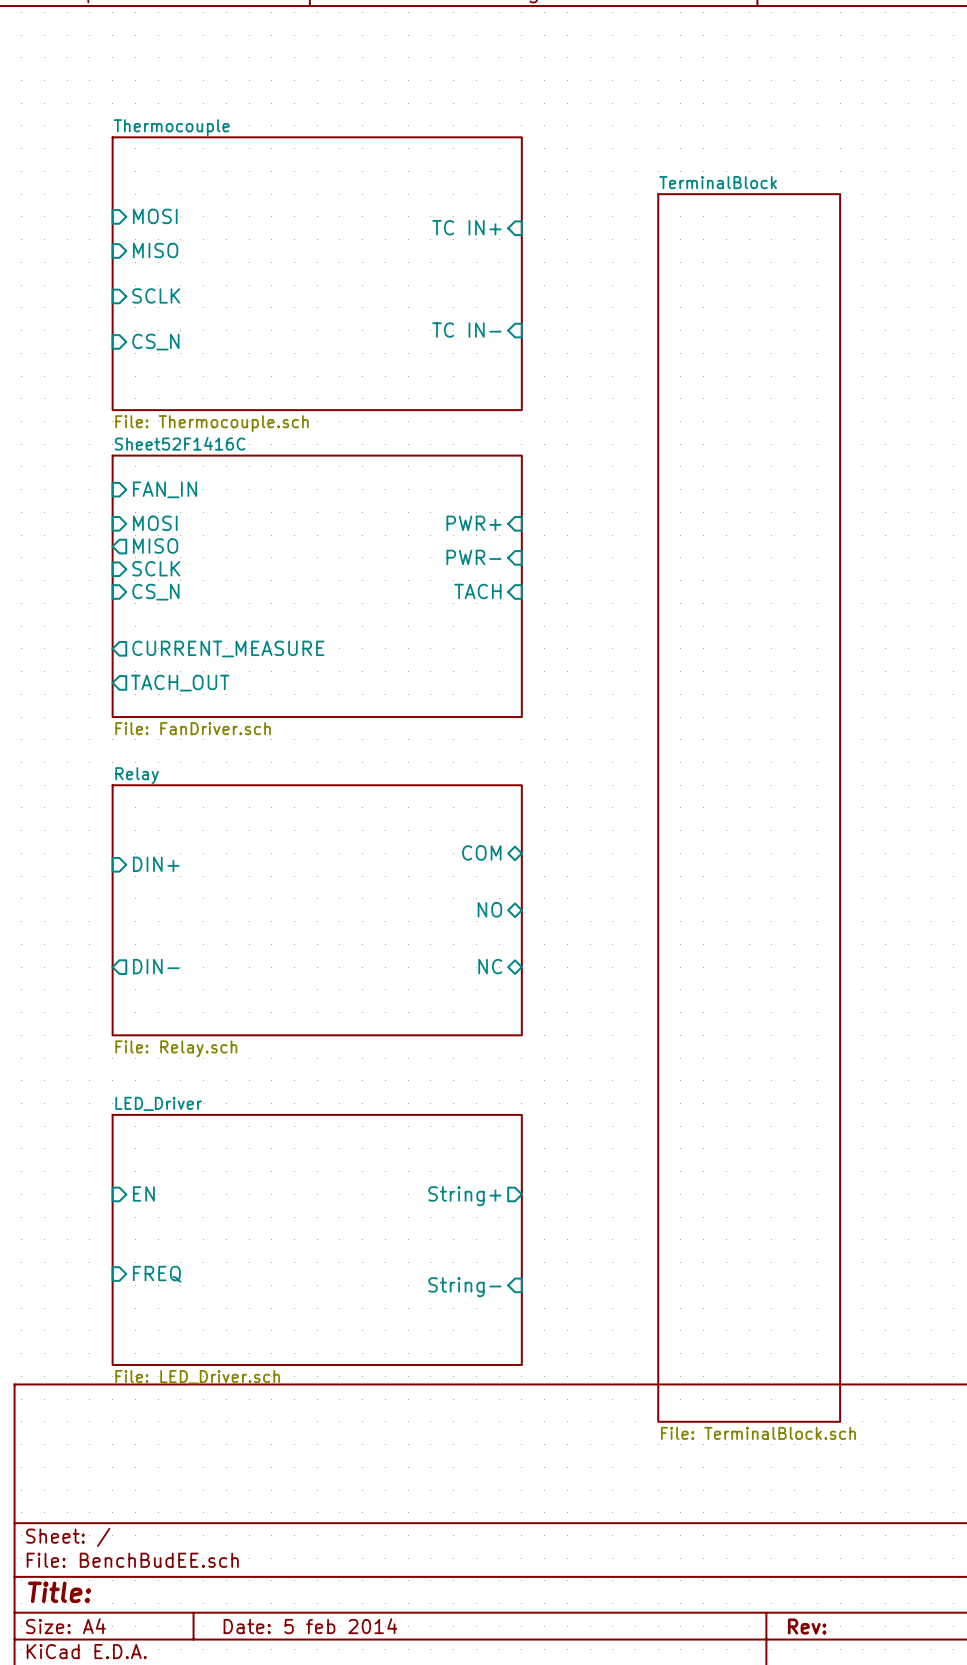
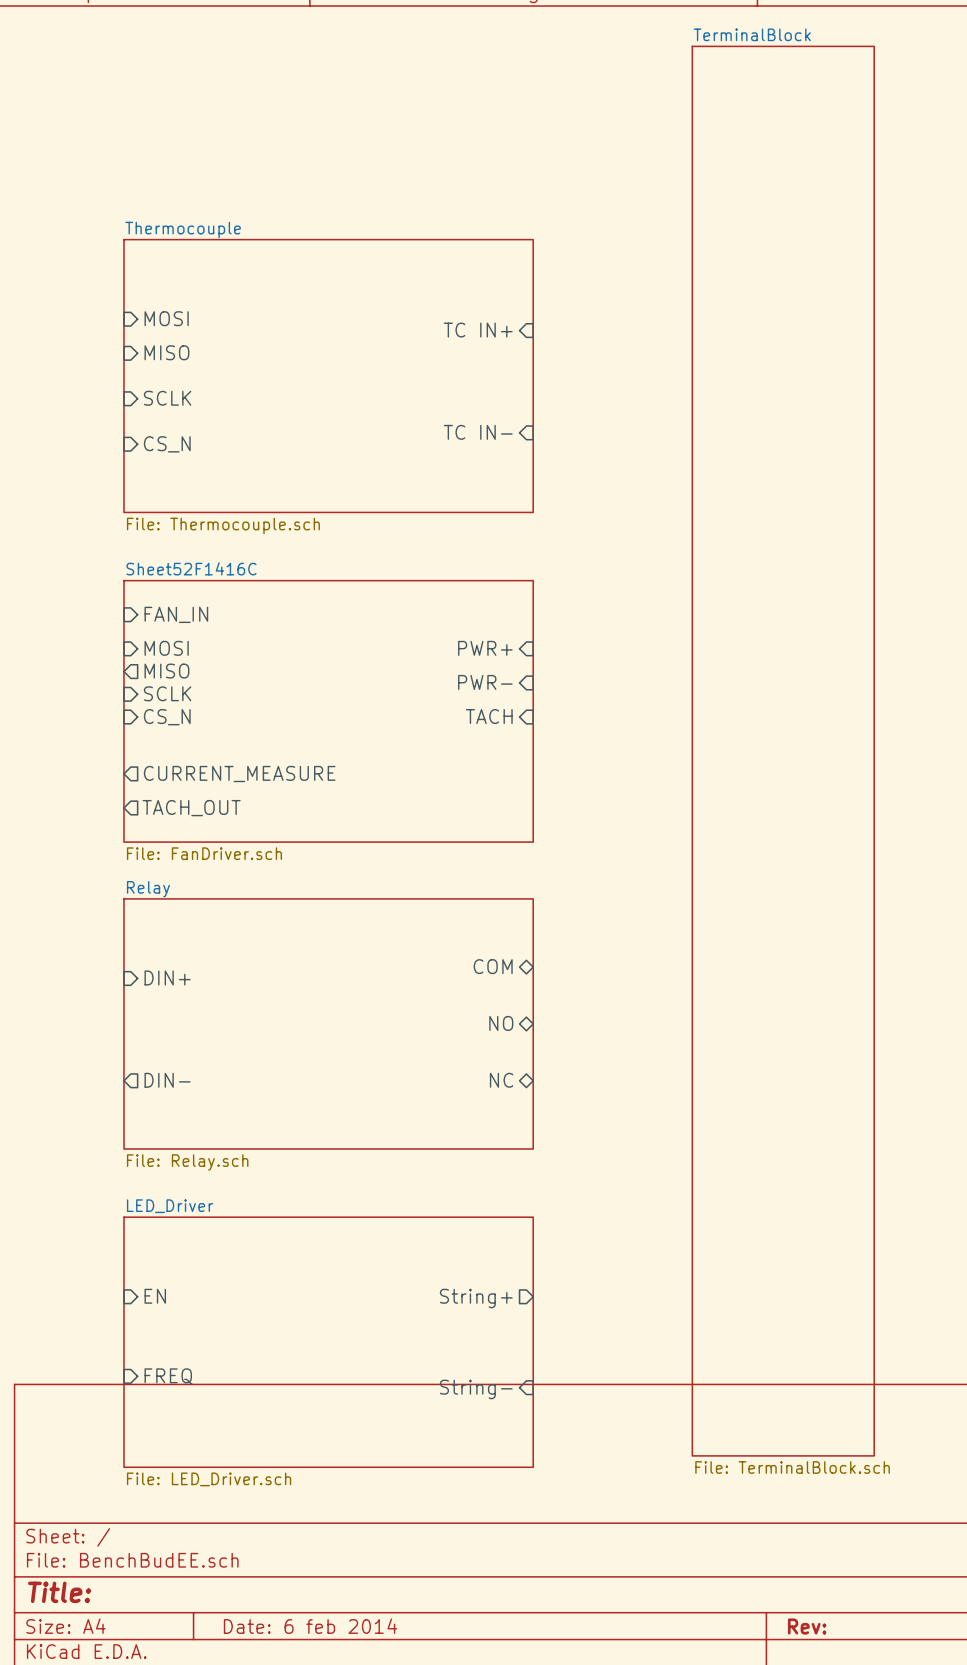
sheet pin: MOSI (155, 216) -> none
sheet pin position: TC IN+ (466, 227) -> TC IN+ (478, 330)
sheet pin: MISO (155, 250) -> none
sheet Thermocouple position: (317, 273) -> (328, 376)
sheet pin: SCLK (156, 295) -> none
sheet pin: none -> MOSI (166, 318)
sheet pin position: TC IN- (466, 330) -> TC IN- (478, 432)
sheet pin: CS_N (155, 342) -> none
sheet pin: none -> MISO (166, 352)
sheet pin: none -> SCLK (167, 398)
sheet pin: none -> CS_N (167, 444)
sheet pin position: FAN_IN (165, 489) -> FAN_IN (176, 614)
sheet pin: MOSI (155, 523) -> none
sheet pin position: PWR+ (474, 523) -> PWR+ (485, 648)
sheet pin: MISO (155, 546) -> none
sheet pin position: PWR- (474, 557) -> PWR- (485, 682)
sheet pin: SCLK (156, 568) -> none
sheet Sheet52F1416C position: (317, 586) -> (328, 711)
sheet pin position: TACH (477, 591) -> TACH (489, 716)
sheet pin: CS_N (155, 592) -> none
sheet pin: none -> MOSI (166, 648)
sheet pin position: CURRENT_MEASURE (228, 648) -> CURRENT_MEASURE (239, 774)
sheet pin: none -> MISO (166, 671)
sheet pin position: TACH_OUT (180, 683) -> TACH_OUT (191, 808)
sheet pin: none -> SCLK (167, 693)
sheet pin: none -> CS_N (167, 717)
sheet TerminalBlock: none -> File: TerminalBlock.sch (783, 751)
sheet TerminalBlock: File: TerminalBlock.sch (749, 807) -> none
sheet pin position: COM (481, 852) -> COM (493, 966)
sheet pin position: DIN+ (156, 864) -> DIN+ (167, 977)
sheet pin position: NO (489, 909) -> NO (501, 1023)
sheet Relay position: (317, 910) -> (328, 1023)
sheet pin position: DIN- (156, 966) -> DIN- (167, 1080)
sheet pin position: NC (490, 966) -> NC (501, 1080)
sheet pin position: EN (143, 1193) -> EN (155, 1296)
sheet pin position: String+ (464, 1196) -> String+ (476, 1298)
sheet LED_Driver position: (317, 1239) -> (328, 1342)
sheet pin position: FREQ (157, 1274) -> FREQ (168, 1376)
sheet pin position: String- (464, 1287) -> String- (476, 1389)
title block: Date: 5 feb 2014 (310, 1626) -> Date: 6 feb 2014 (310, 1626)

